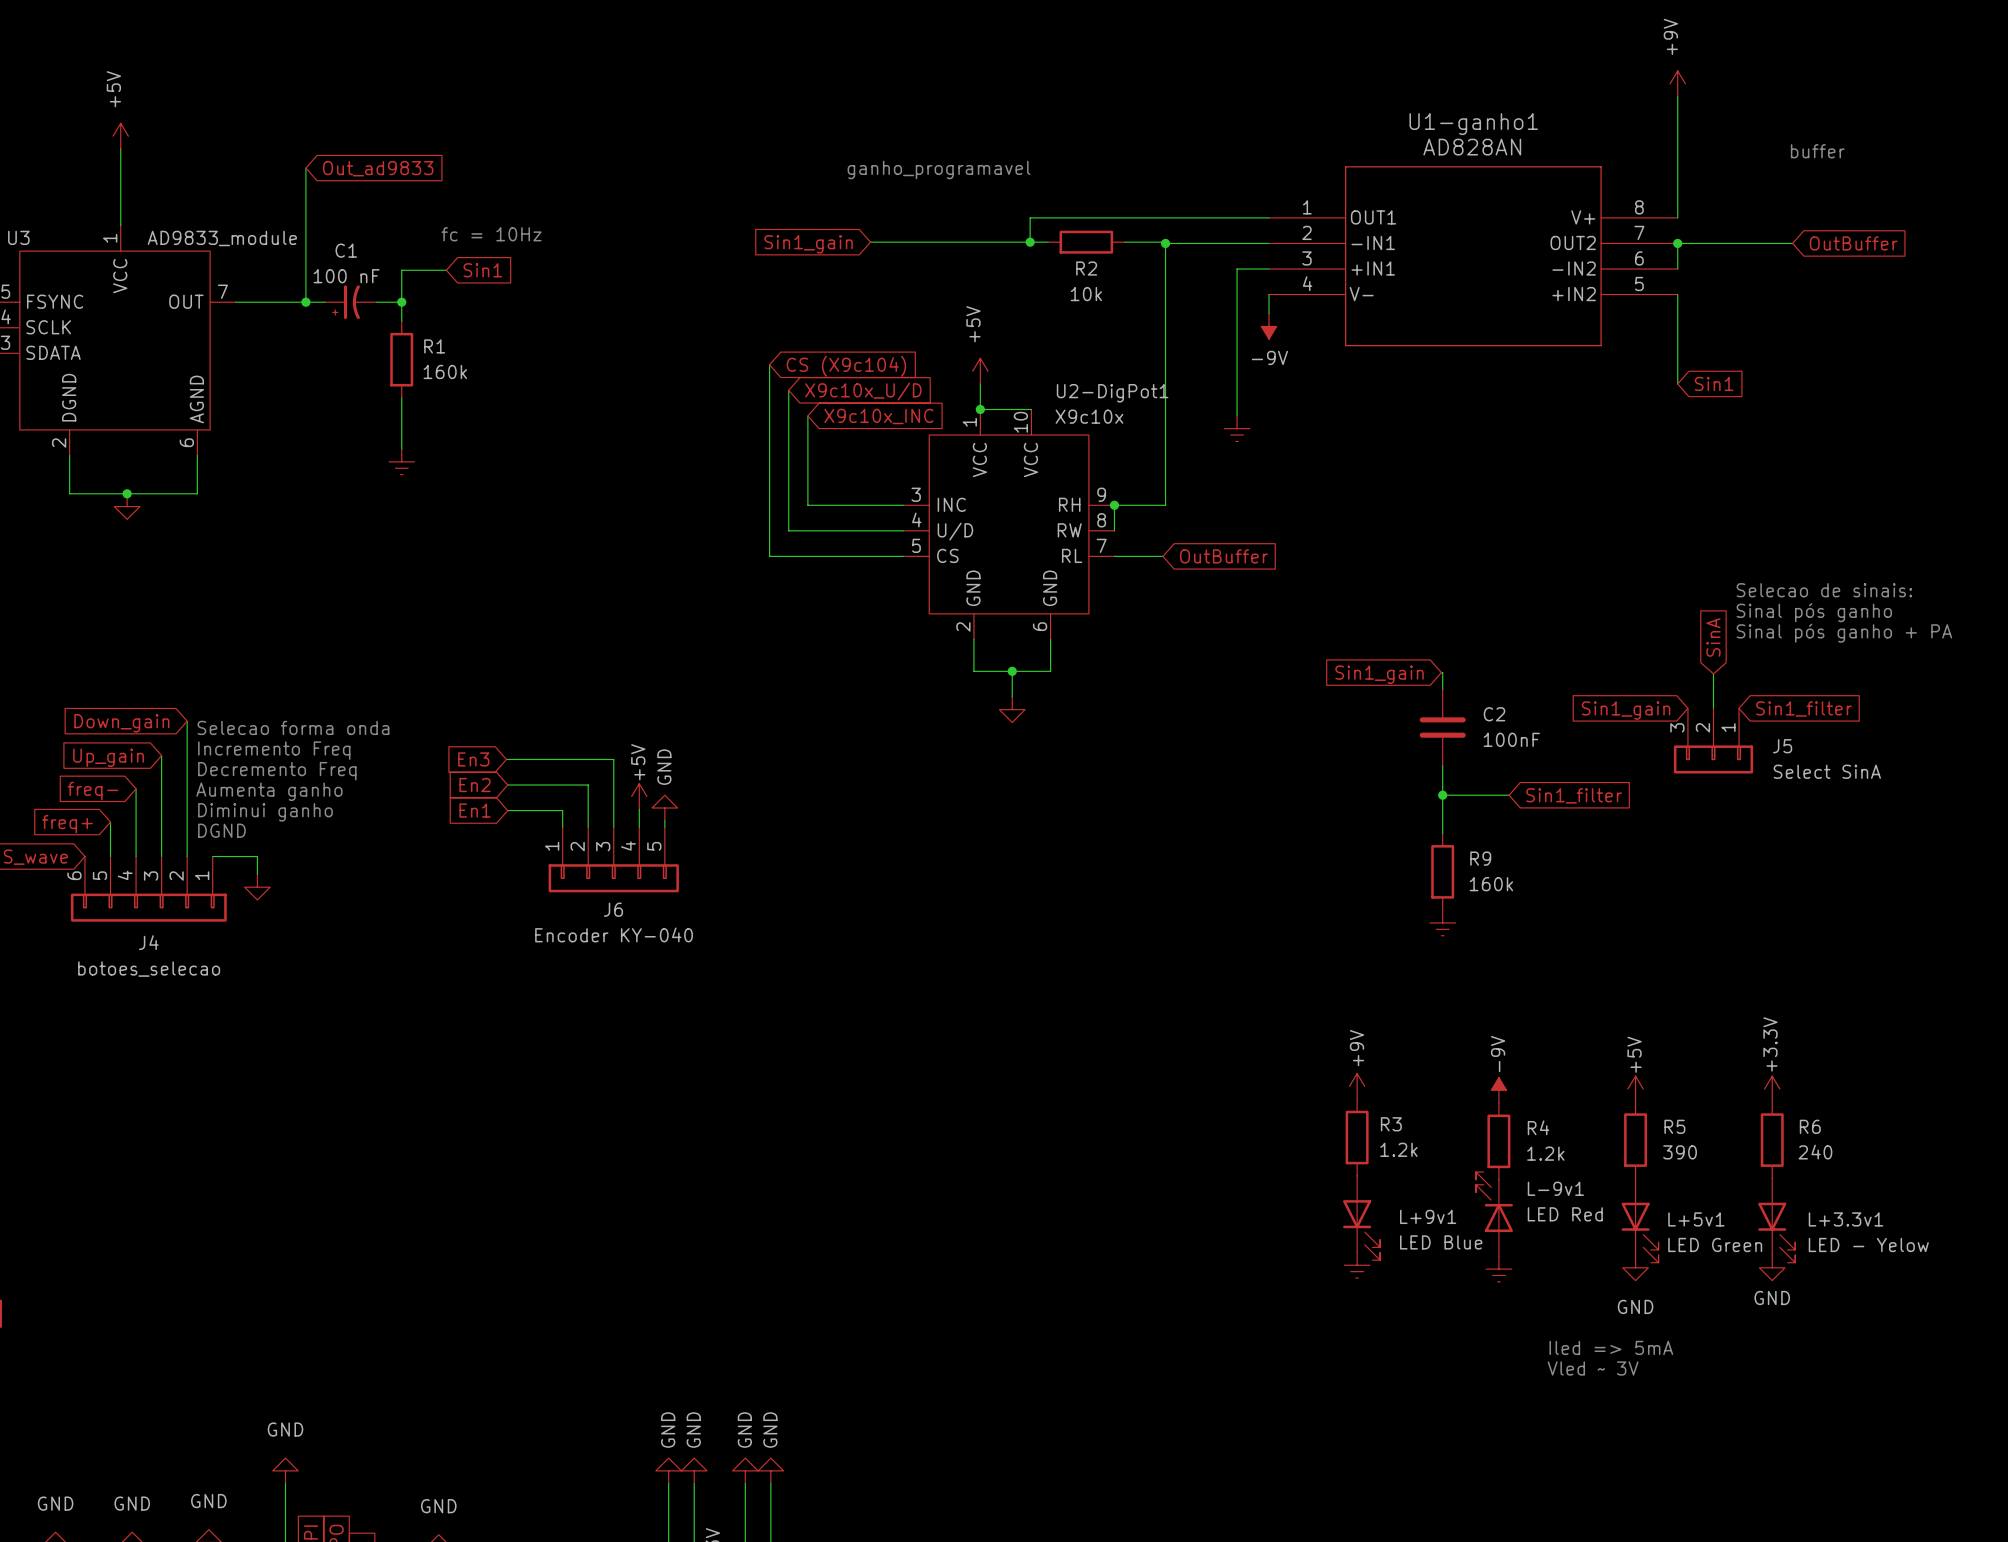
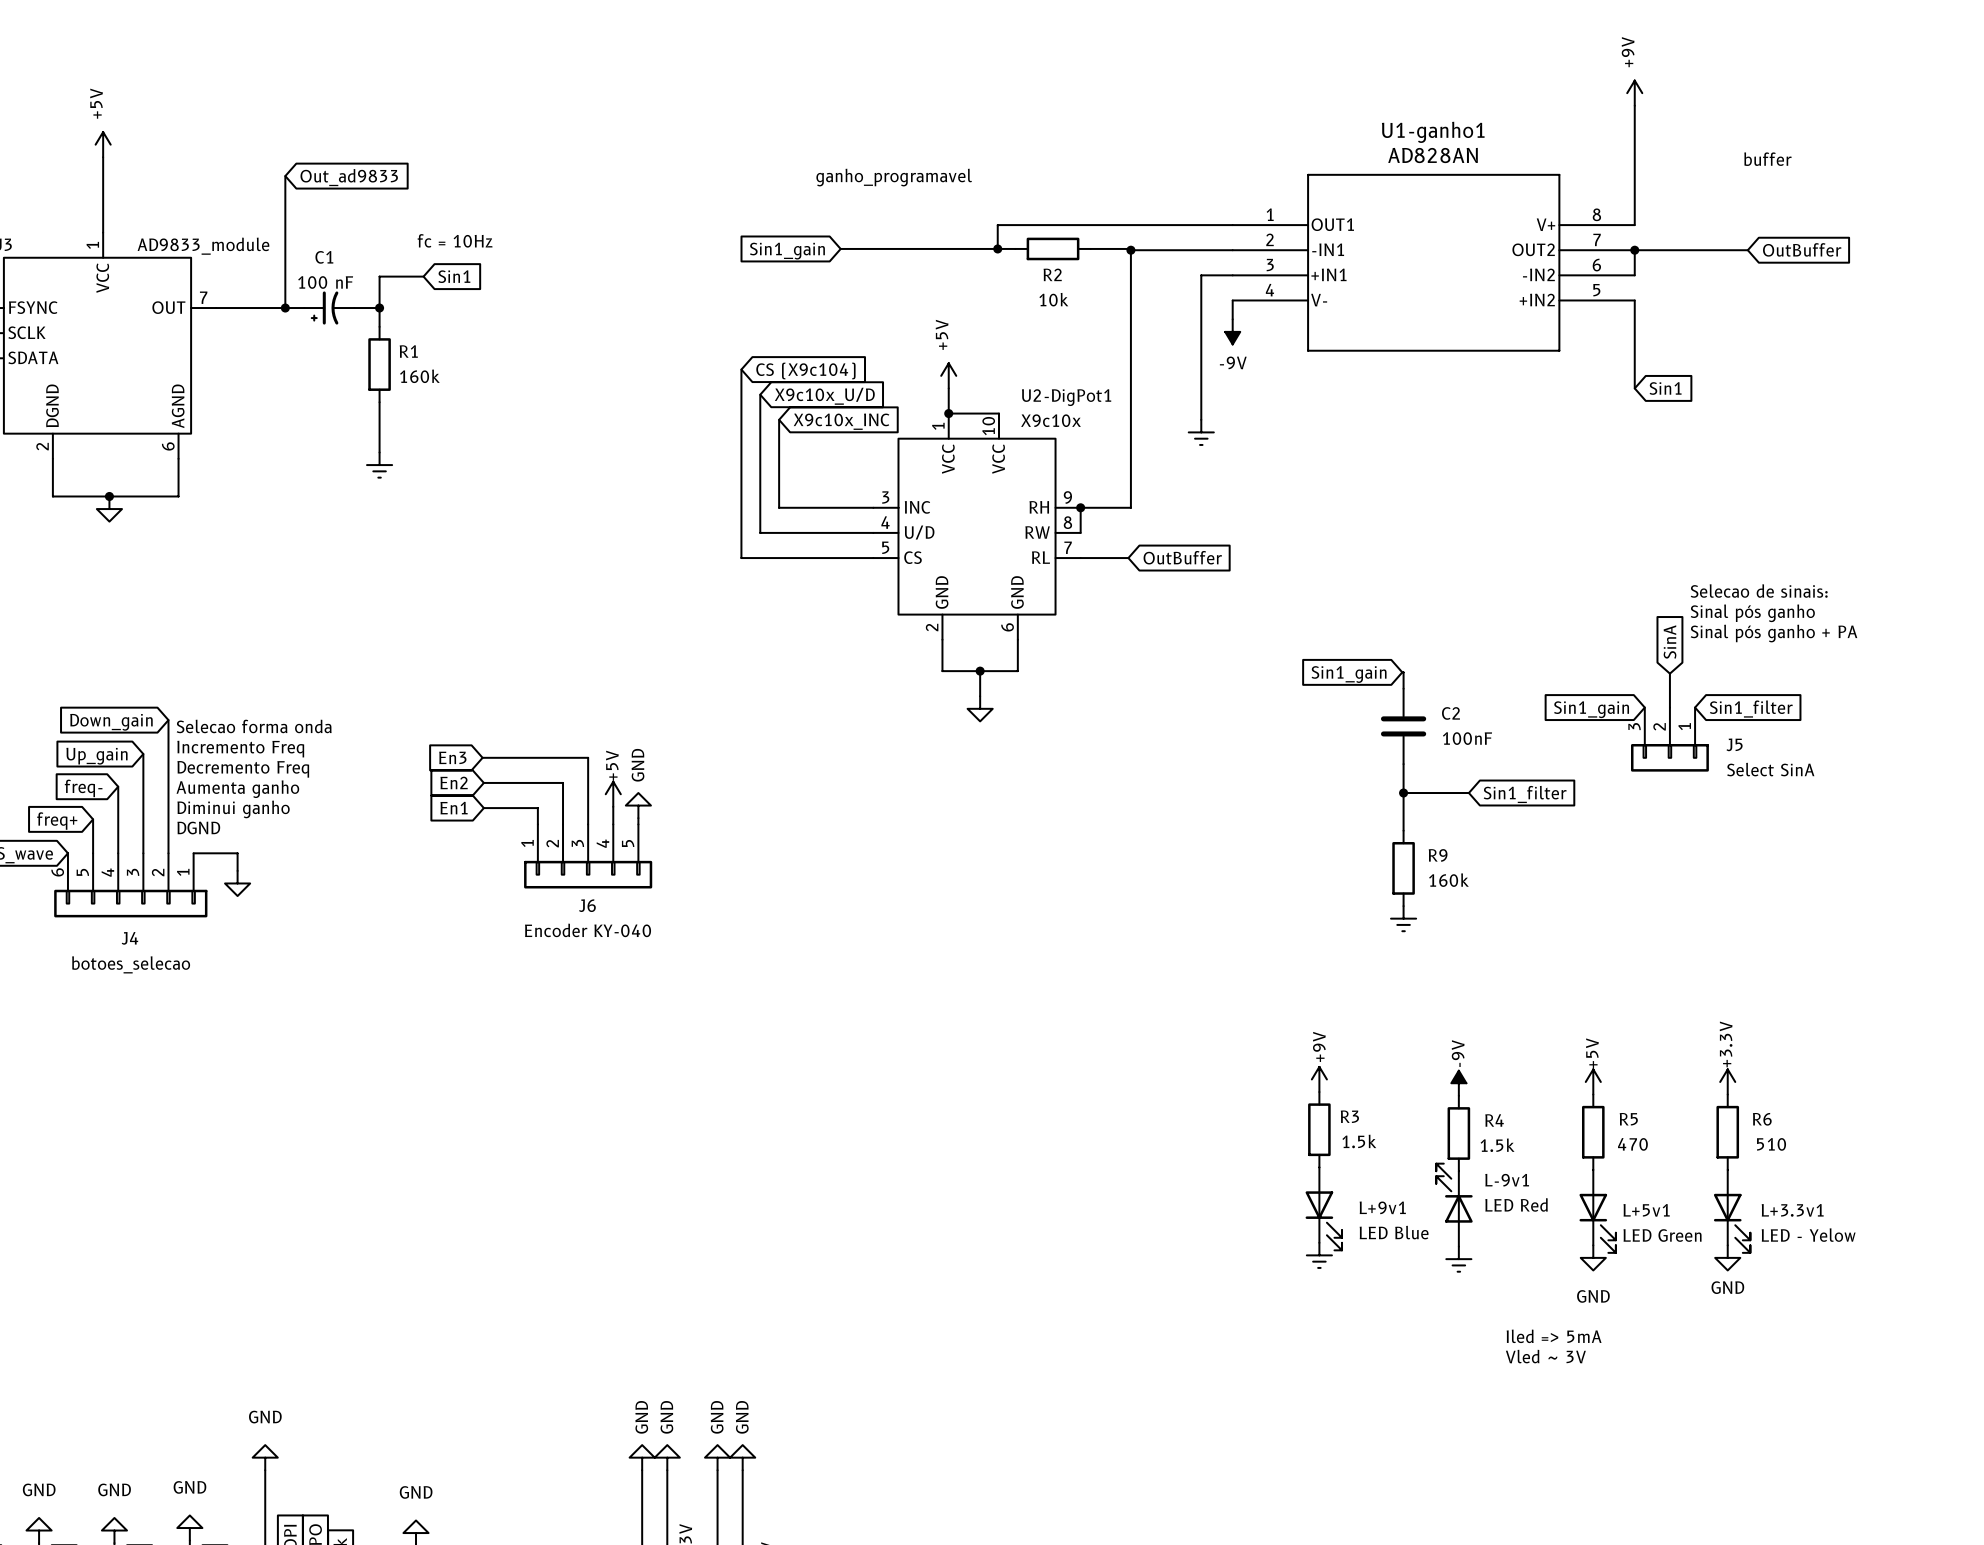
R3 value: 1.2k (1398, 1149) -> 1.5k (1359, 1141)
R5 value: 390 (1680, 1152) -> 470 (1632, 1144)
R6 value: 240 (1815, 1152) -> 510 (1771, 1144)
R4 value: 1.2k (1545, 1153) -> 1.5k (1497, 1145)

